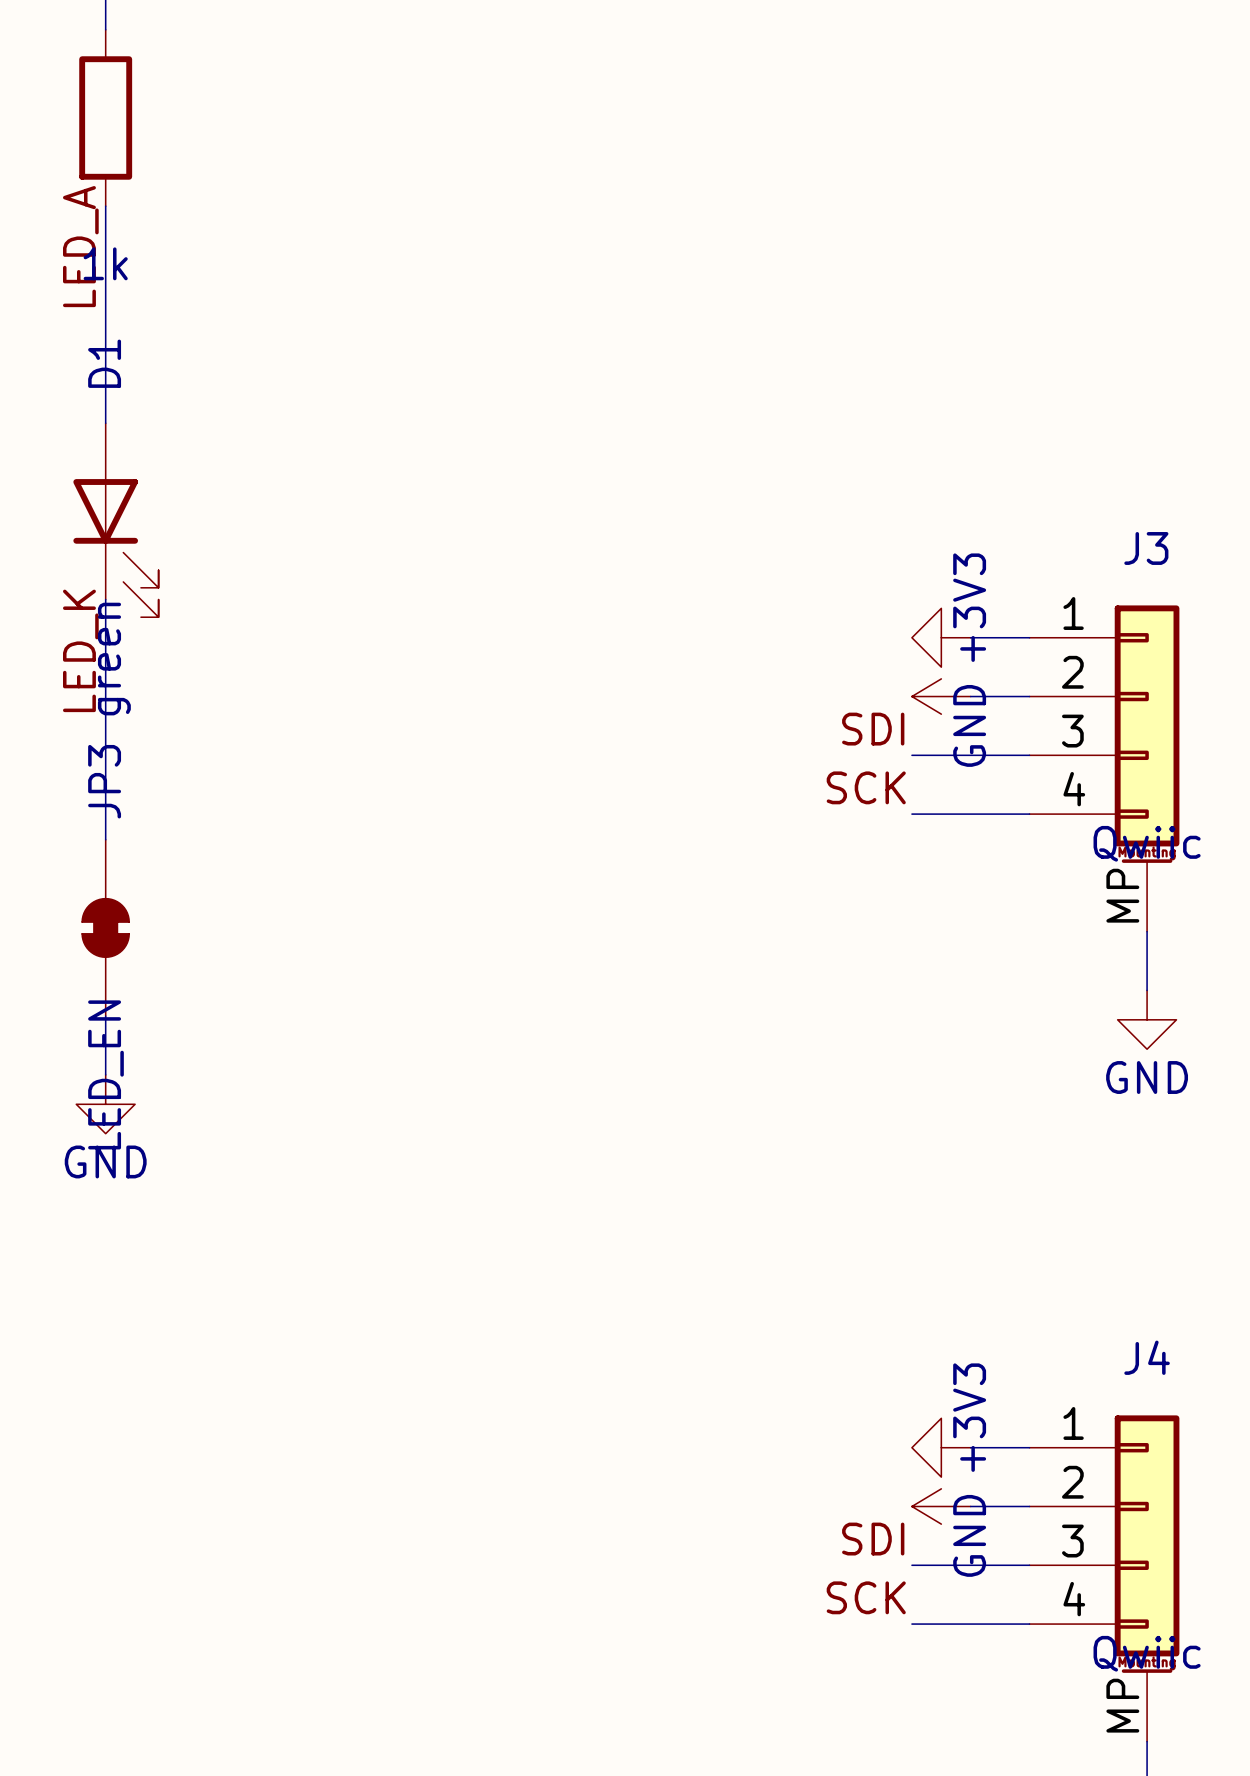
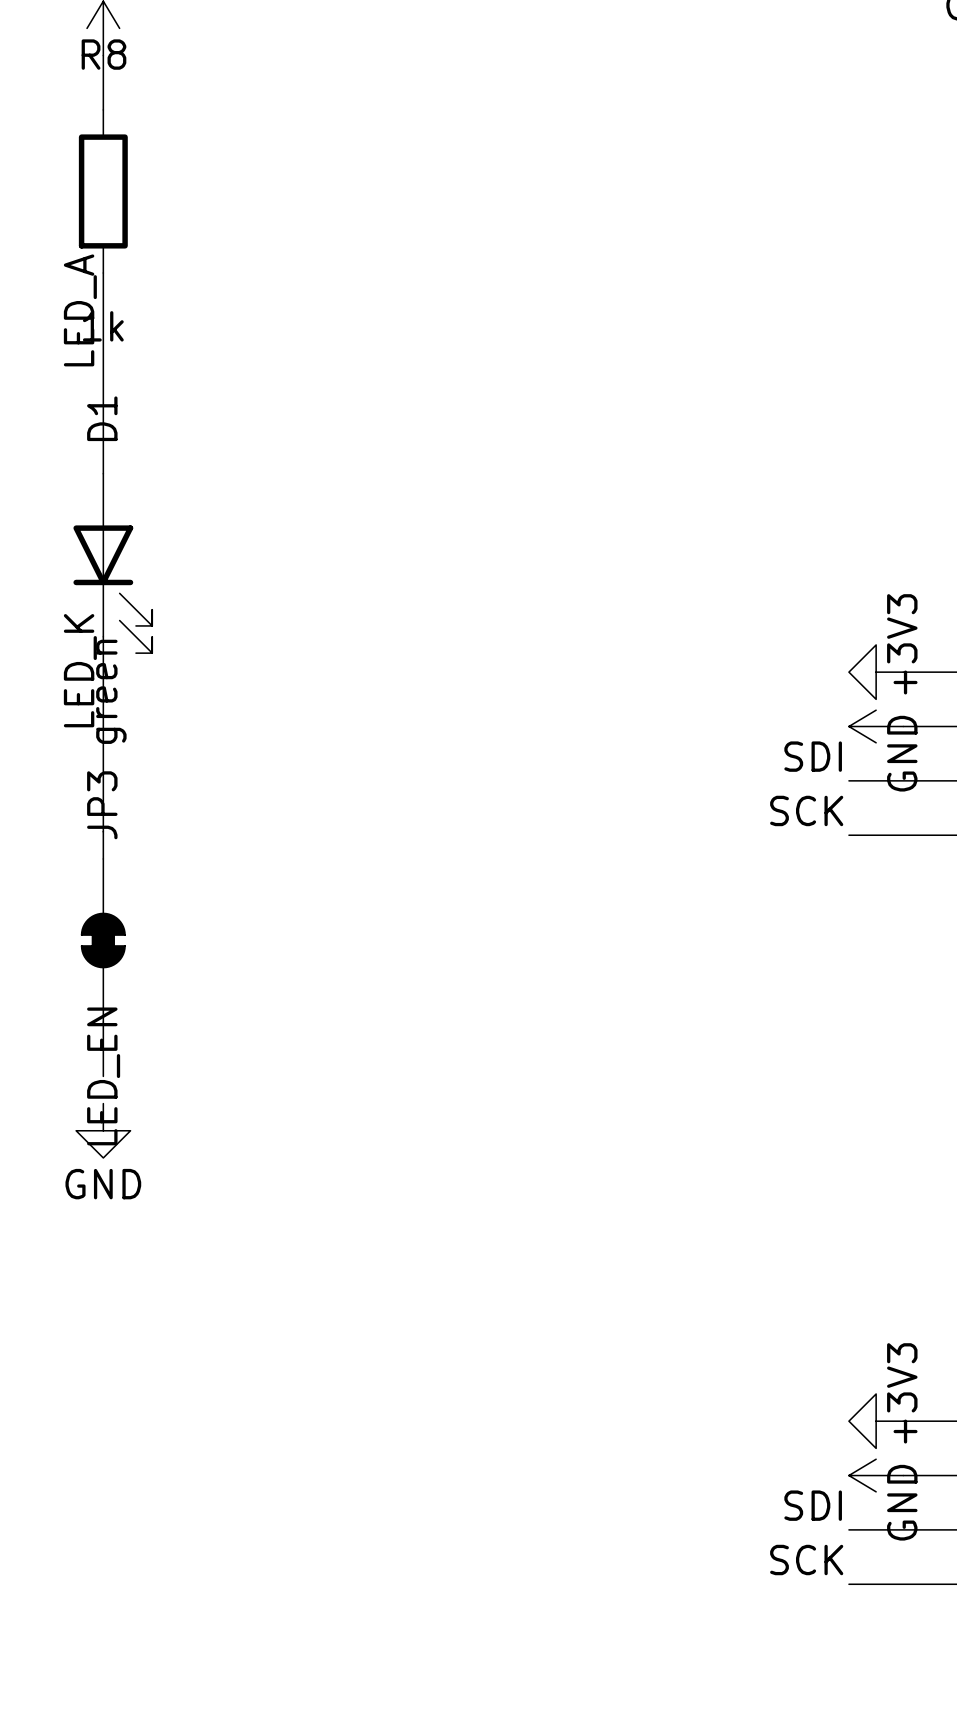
label position: LED_K (80, 650) -> LED_K (80, 670)
power symbol position: GND (105, 1104) -> GND (103, 1130)

